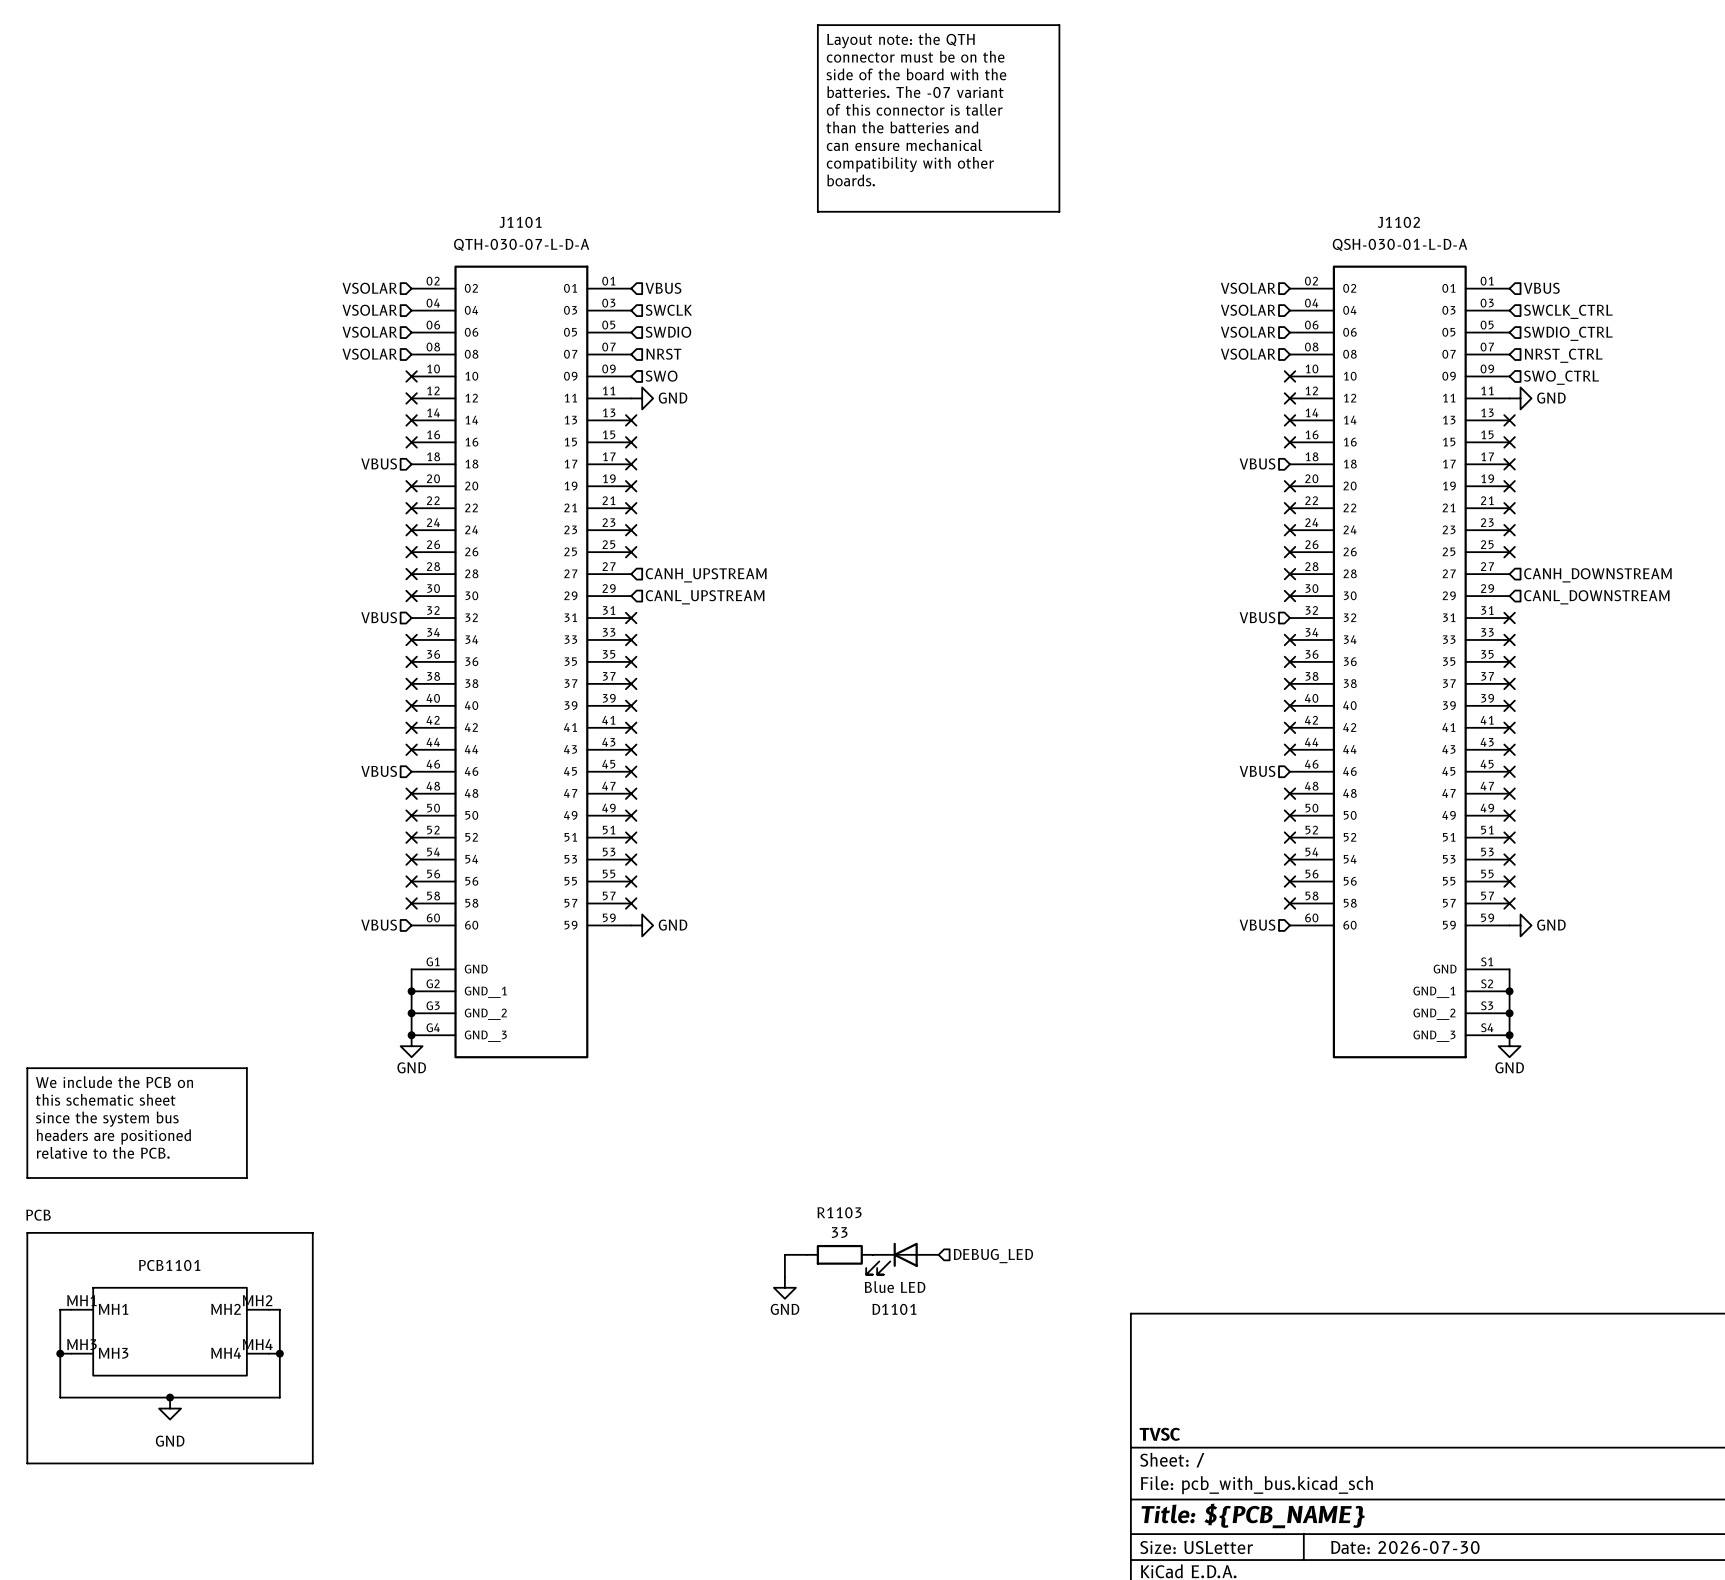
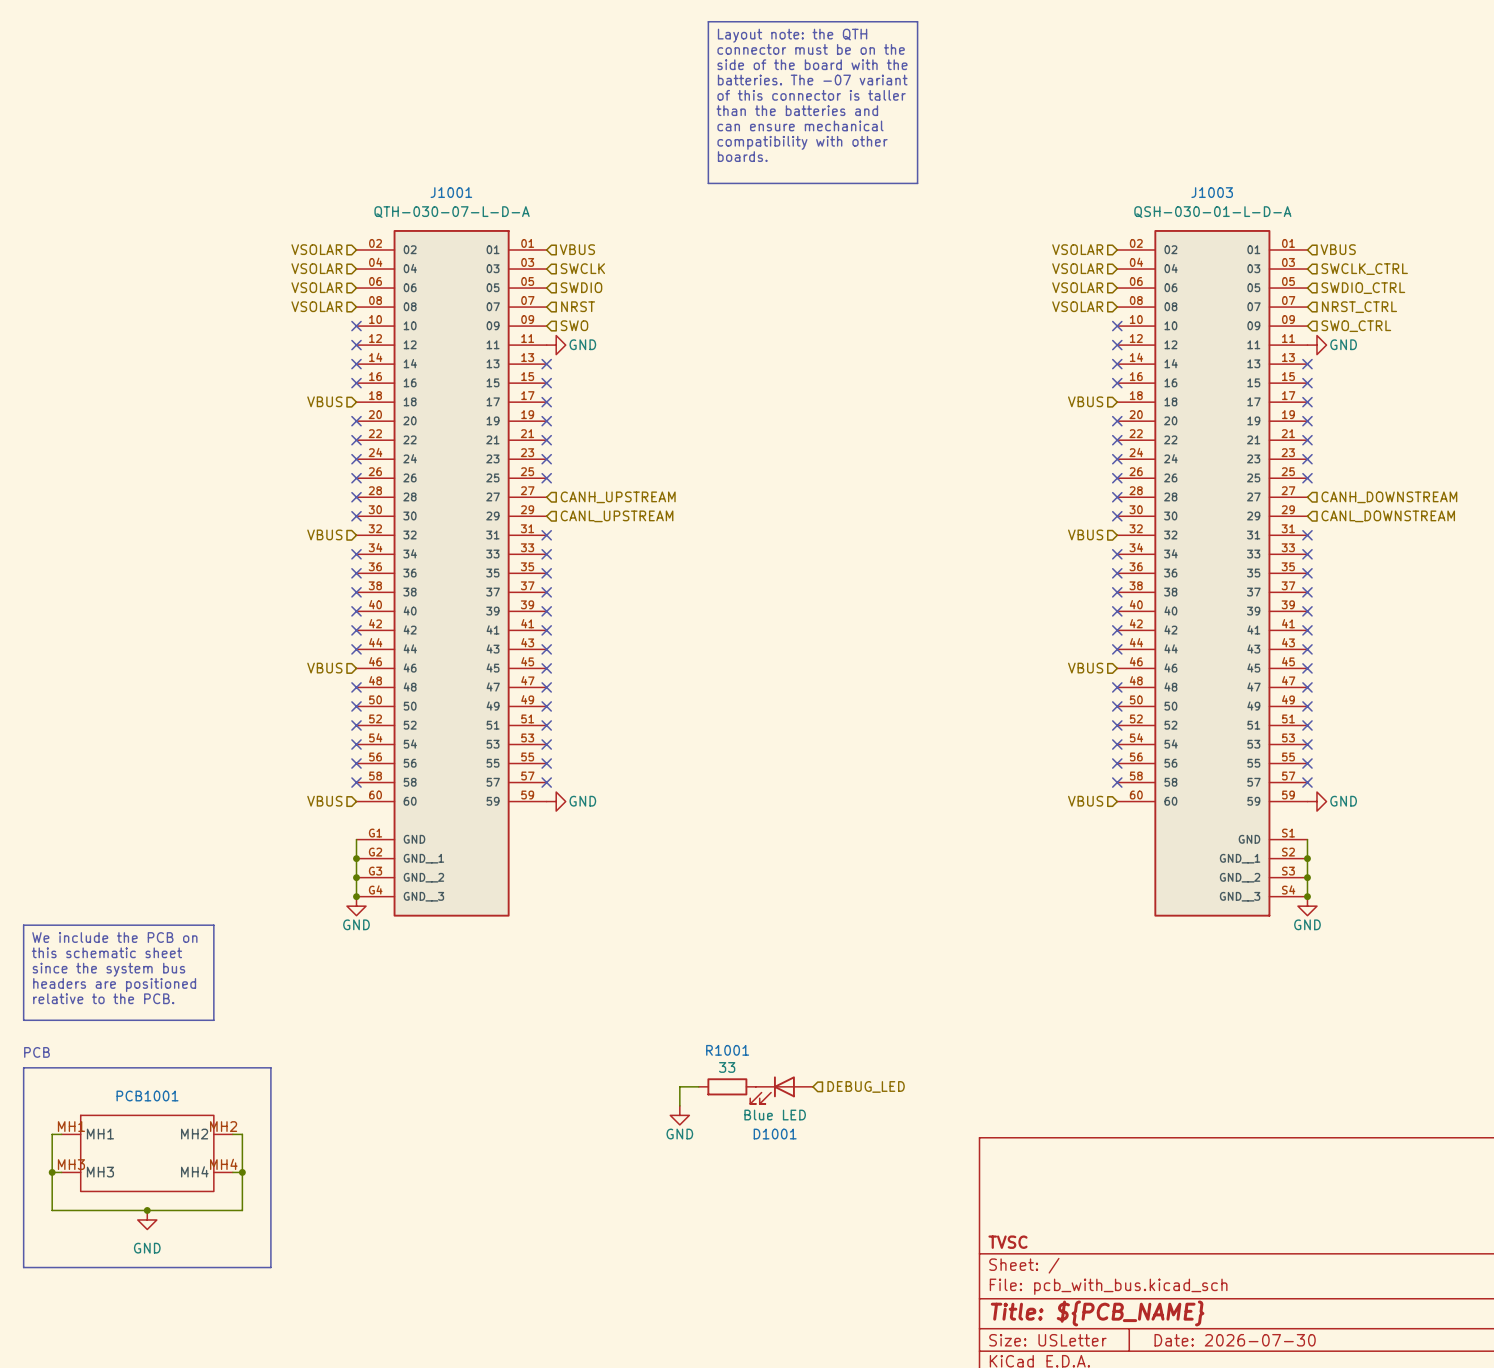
J1101 name: J1101 (520, 222) -> J1001 (451, 192)
J1102 name: J1102 (1398, 222) -> J1003 (1212, 192)
R1103 name: R1103 (839, 1212) -> R1001 (727, 1050)
PCB1101 name: PCB1101 (169, 1265) -> PCB1001 (147, 1096)
D1101 name: D1101 (894, 1309) -> D1001 (775, 1134)

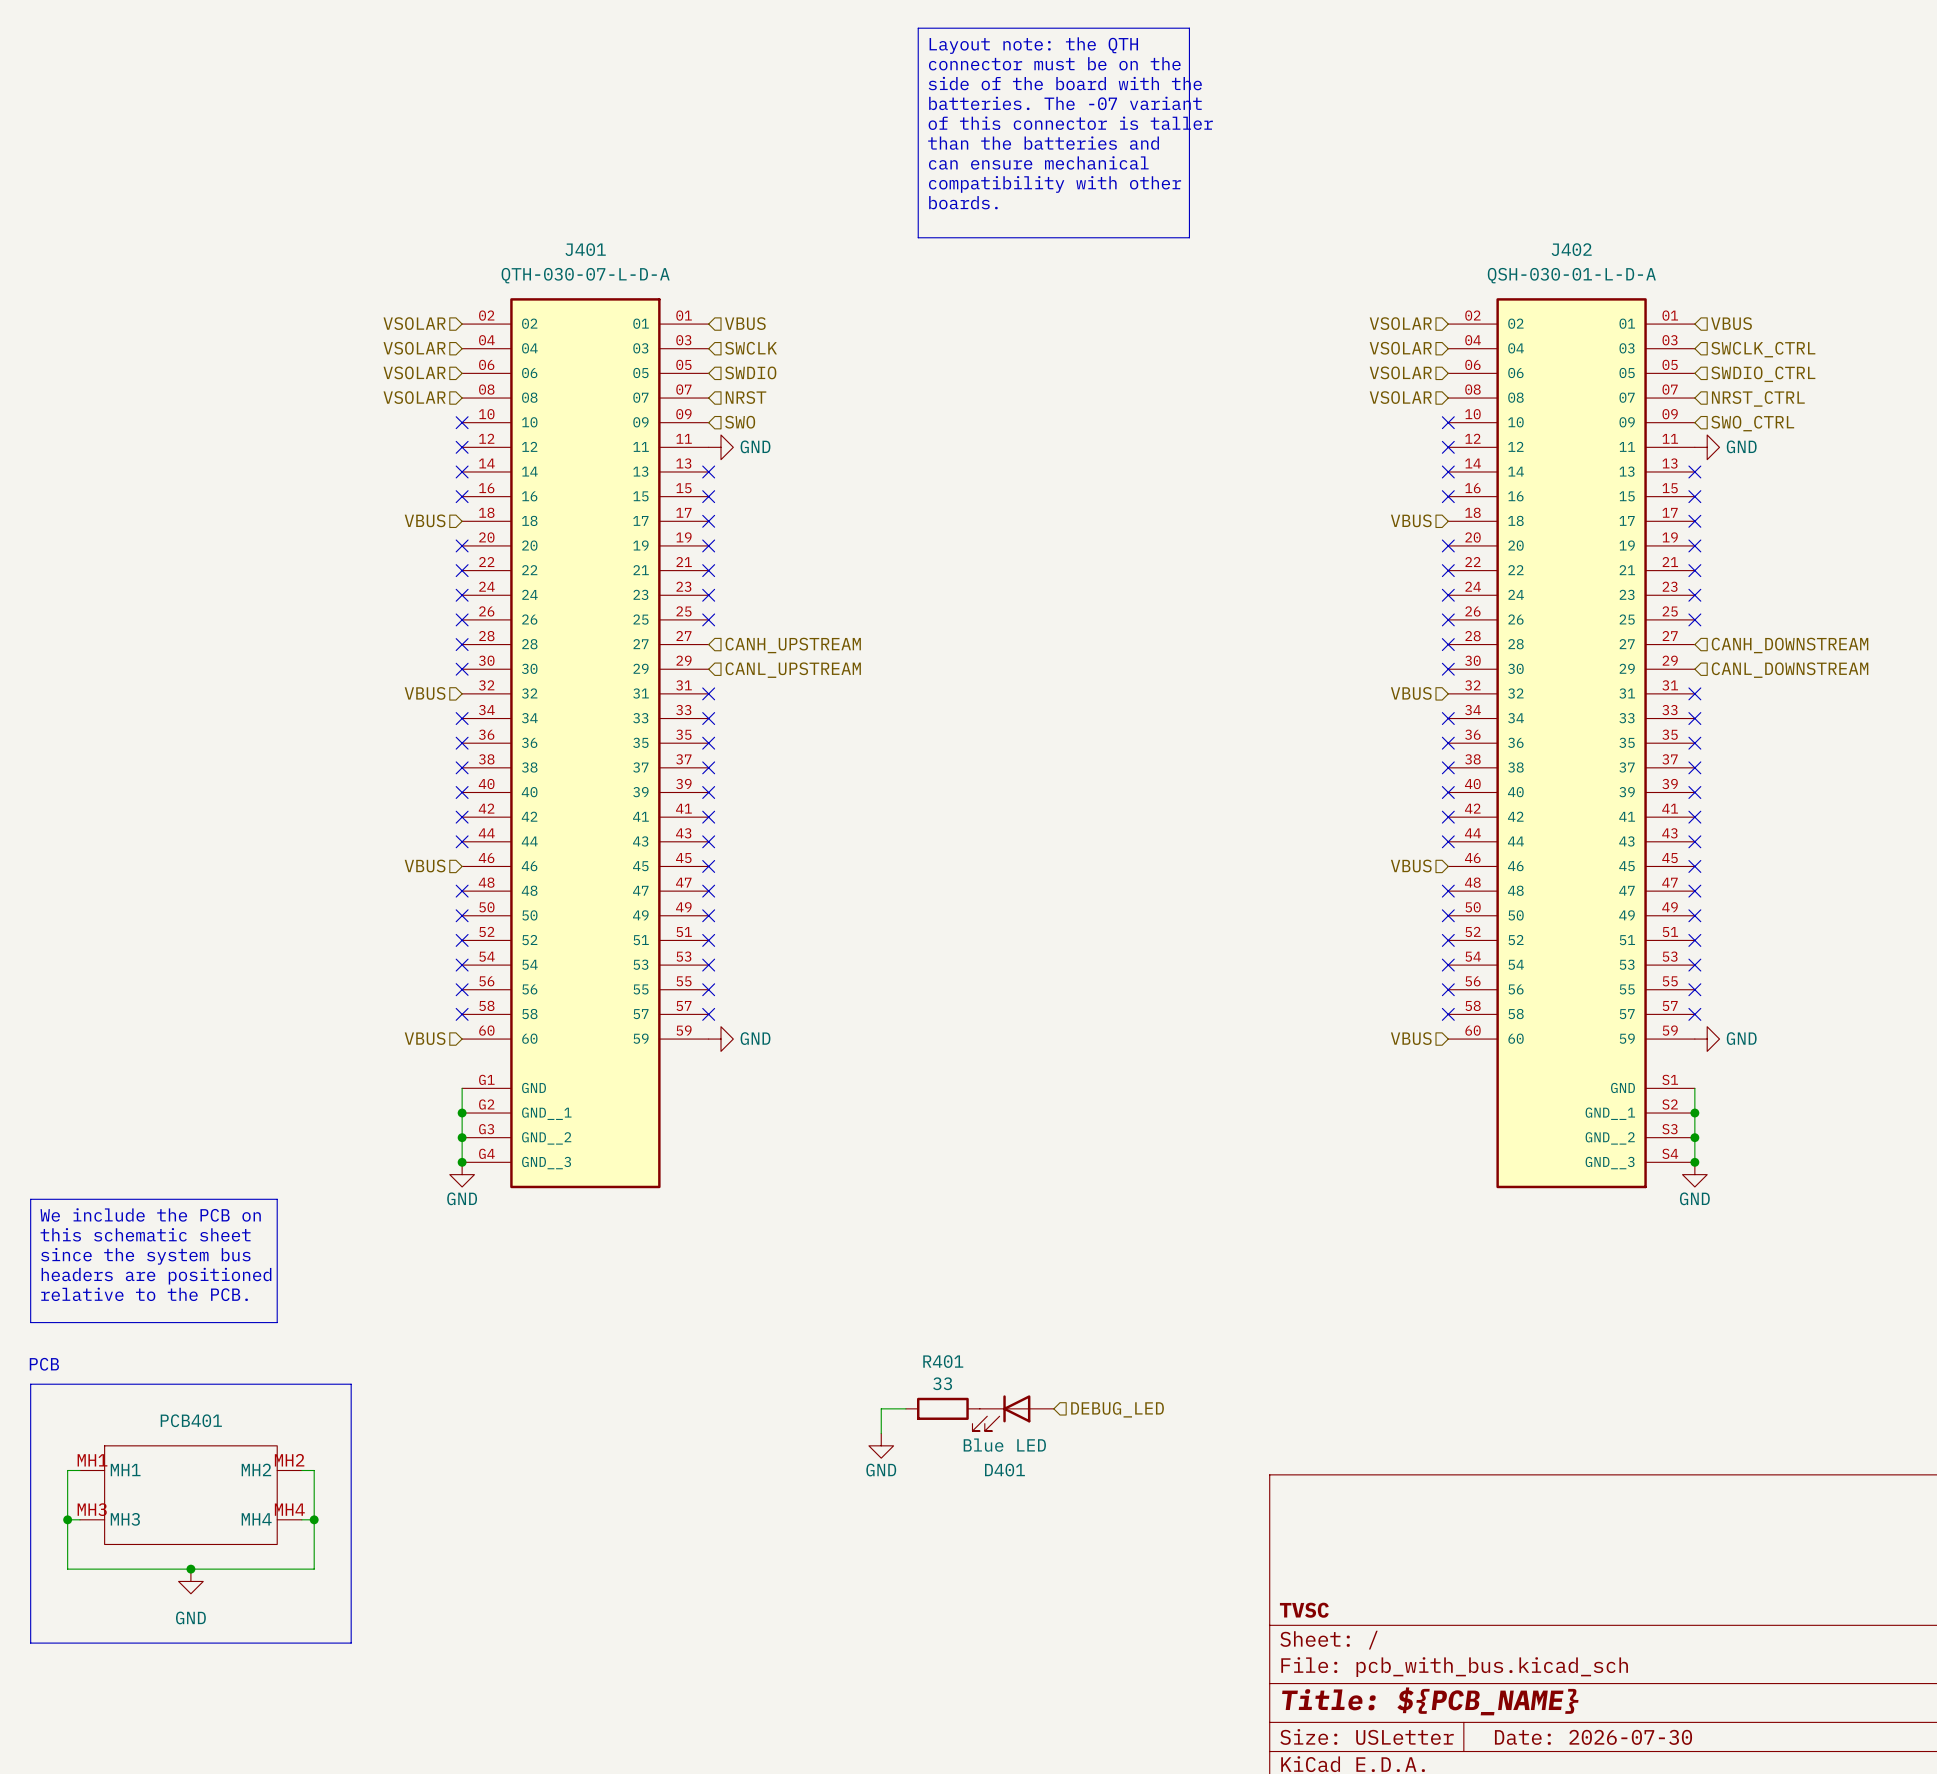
J1001 name: J1001 (451, 192) -> J401 (585, 249)
J1003 name: J1003 (1212, 192) -> J402 (1571, 249)
R1001 name: R1001 (727, 1050) -> R401 (943, 1361)
PCB1001 name: PCB1001 (147, 1096) -> PCB401 (191, 1420)
D1001 name: D1001 (775, 1134) -> D401 (1004, 1470)

